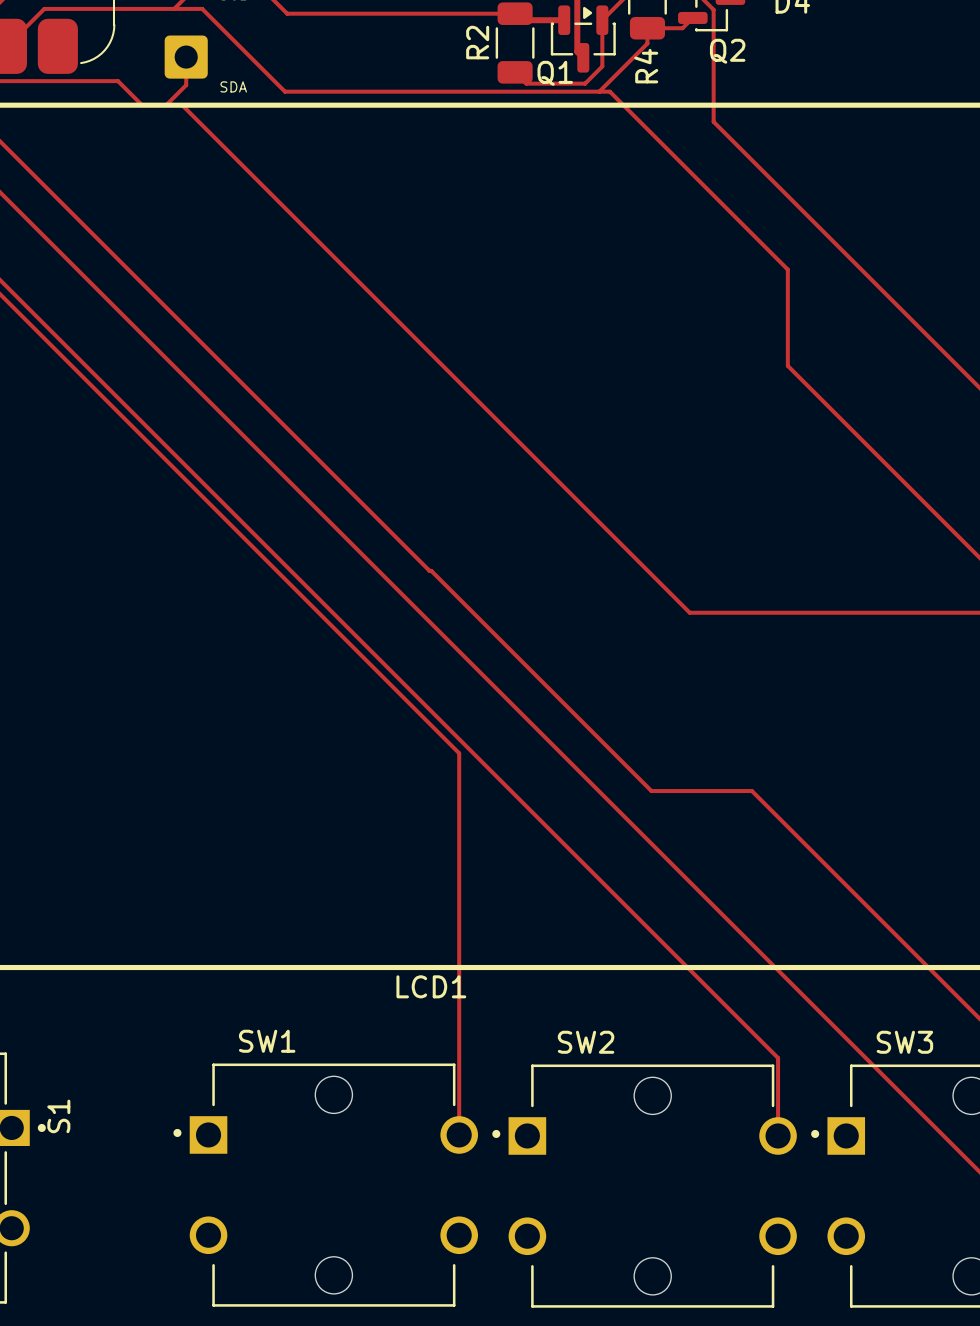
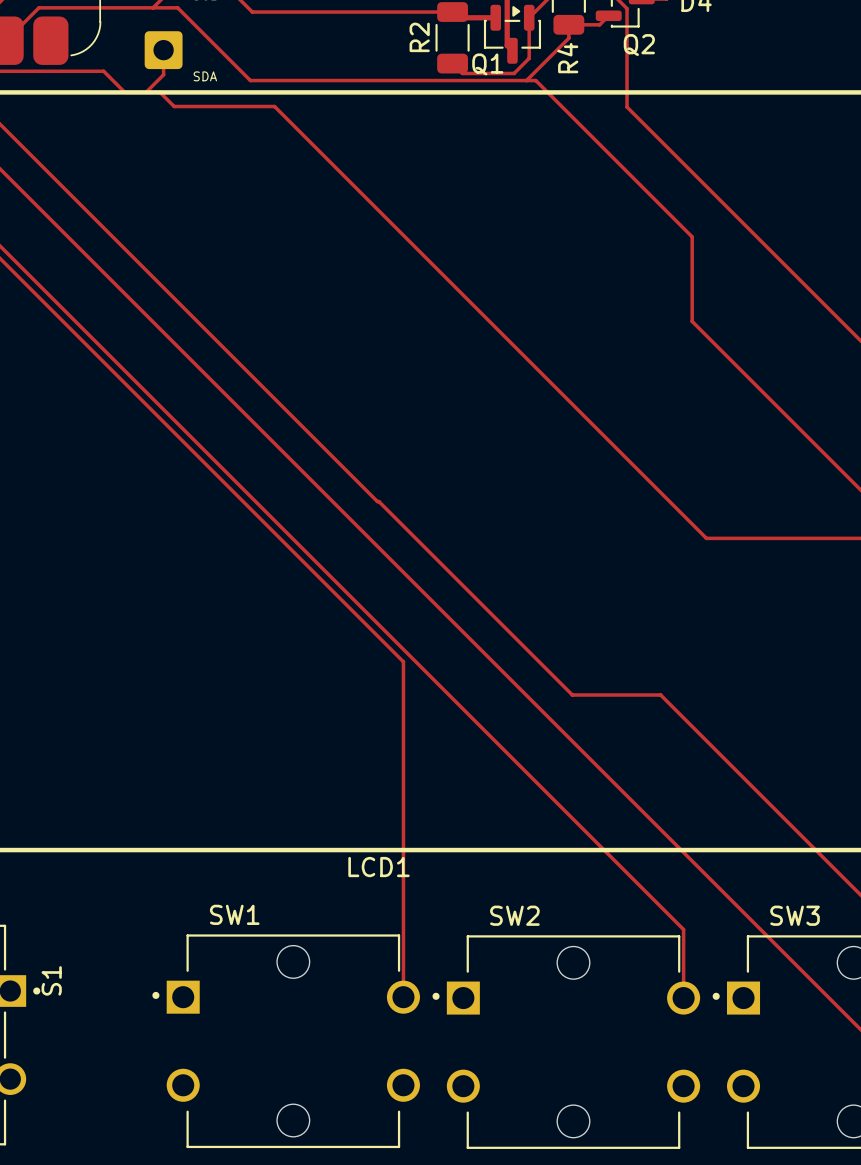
track: (198, 121) (689, 612) (804, 612) -> (174, 106) (274, 106) (706, 538)

